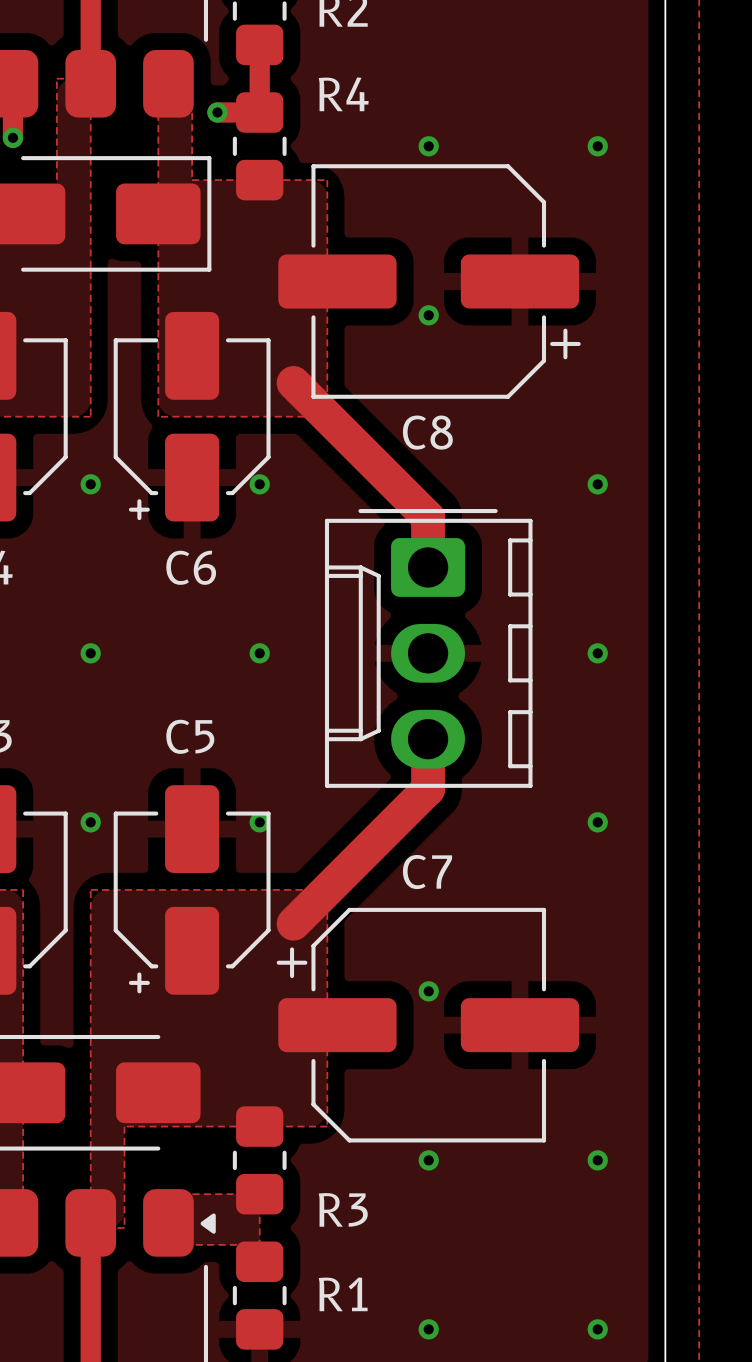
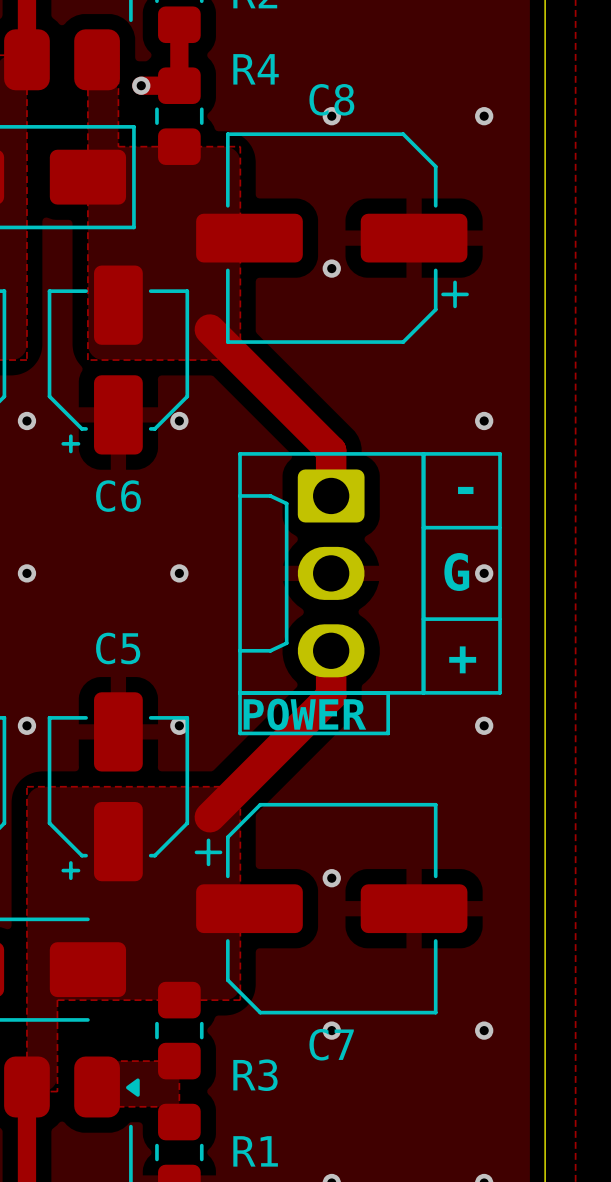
C8 name position: C8 (427, 432) -> C8 (331, 99)
part footprint: [324, 509, 533, 788] -> [238, 452, 426, 695]
line: none -> (423, 453) (500, 453) (500, 692) (423, 692) (423, 453)
text: none -> - (465, 490)
line: none -> (423, 527) (499, 527)
text: none -> G (456, 571)
line: none -> (423, 619) (499, 619)
text: none -> + (462, 659)
line: none -> (240, 692) (388, 692) (388, 733) (240, 733) (240, 692)
text: none -> POWER (304, 714)
C7 name position: C7 (427, 872) -> C7 (331, 1044)

